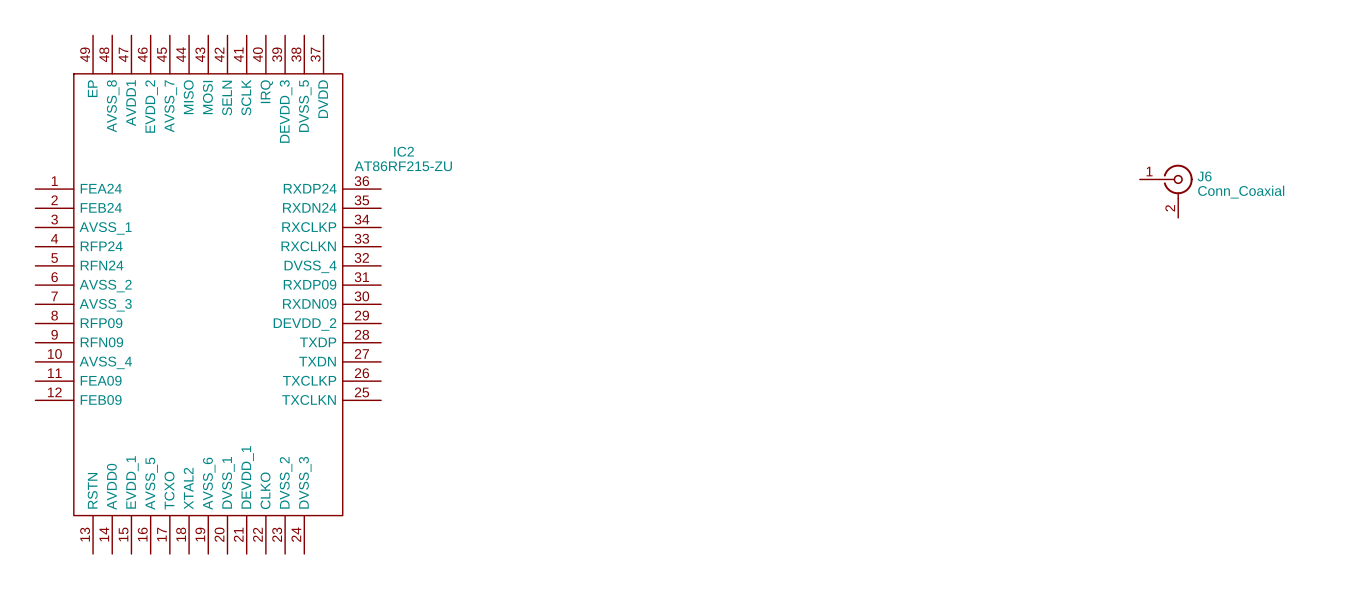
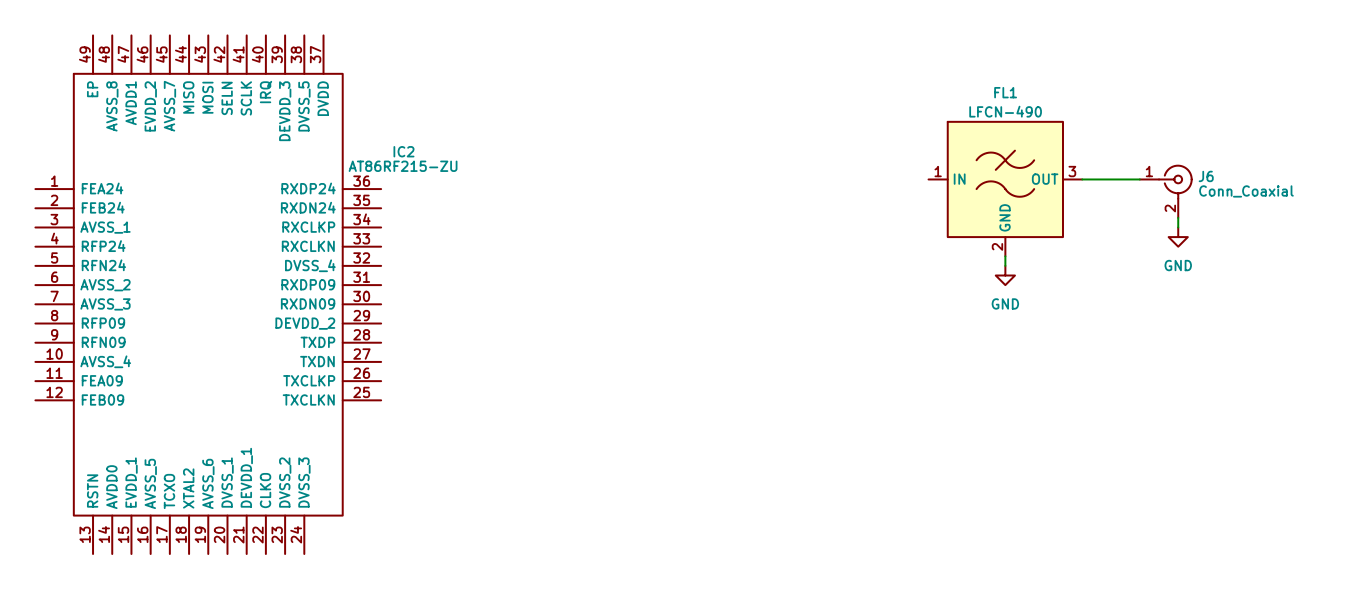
wire: none -> (1082, 179) (1139, 179)
FL1: none -> LFCN-490 (1005, 188)
wire: none -> (1178, 217) (1178, 227)
power symbol: none -> GND (1178, 237)
wire: none -> (1005, 256) (1005, 265)
power symbol: none -> GND (1005, 275)

